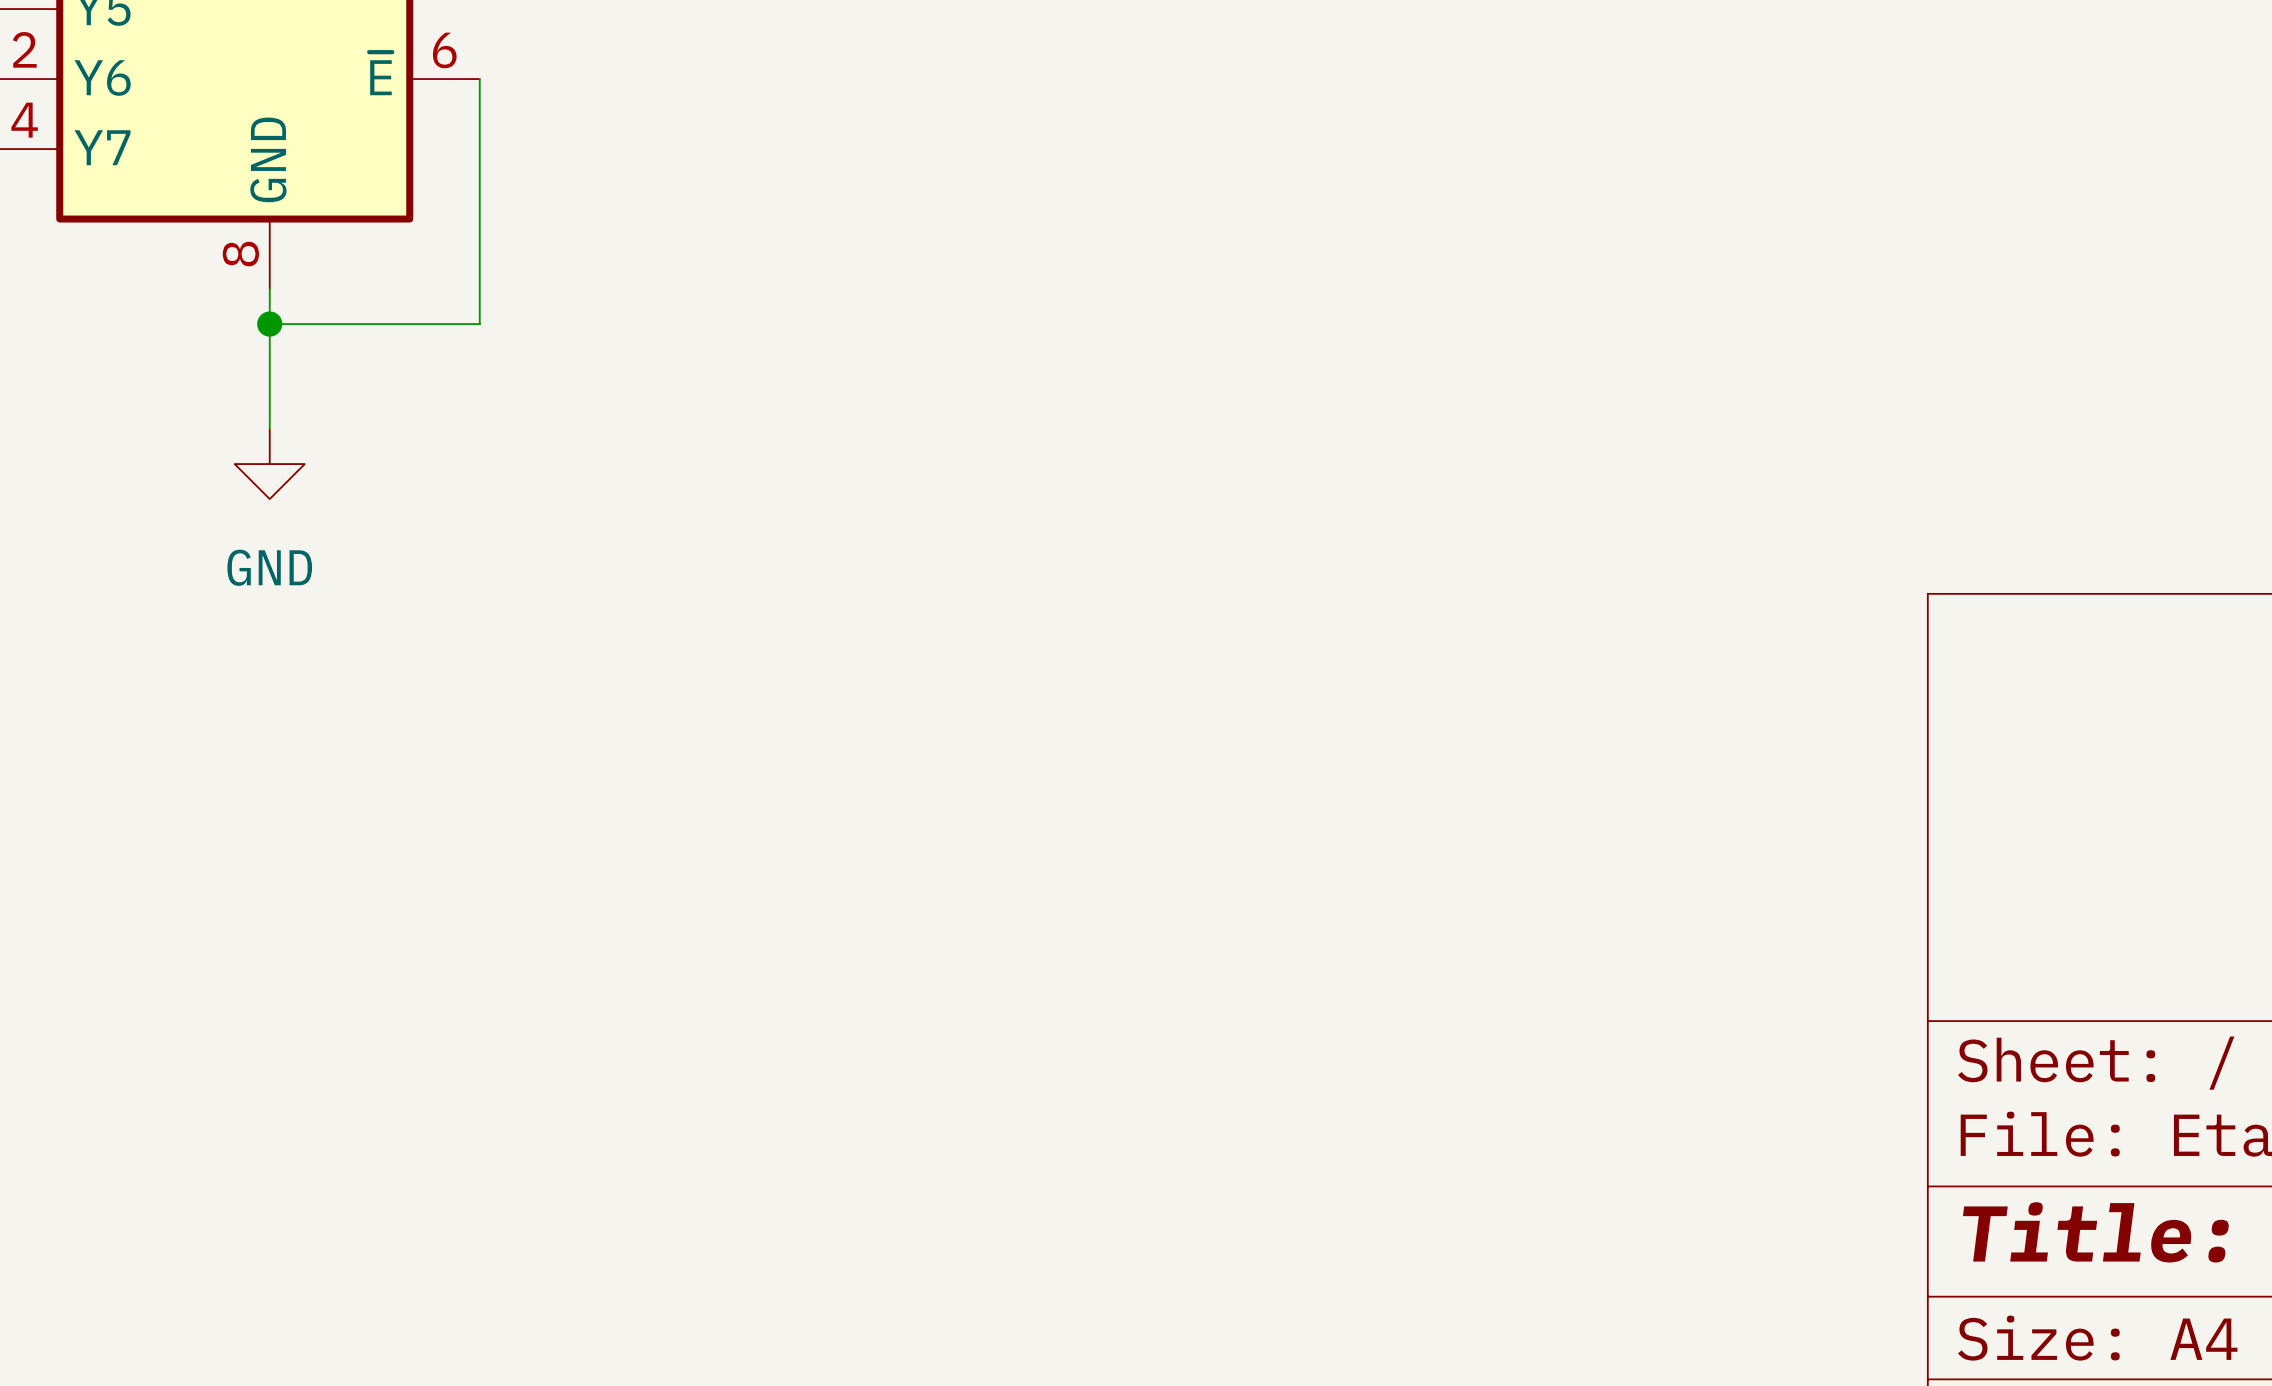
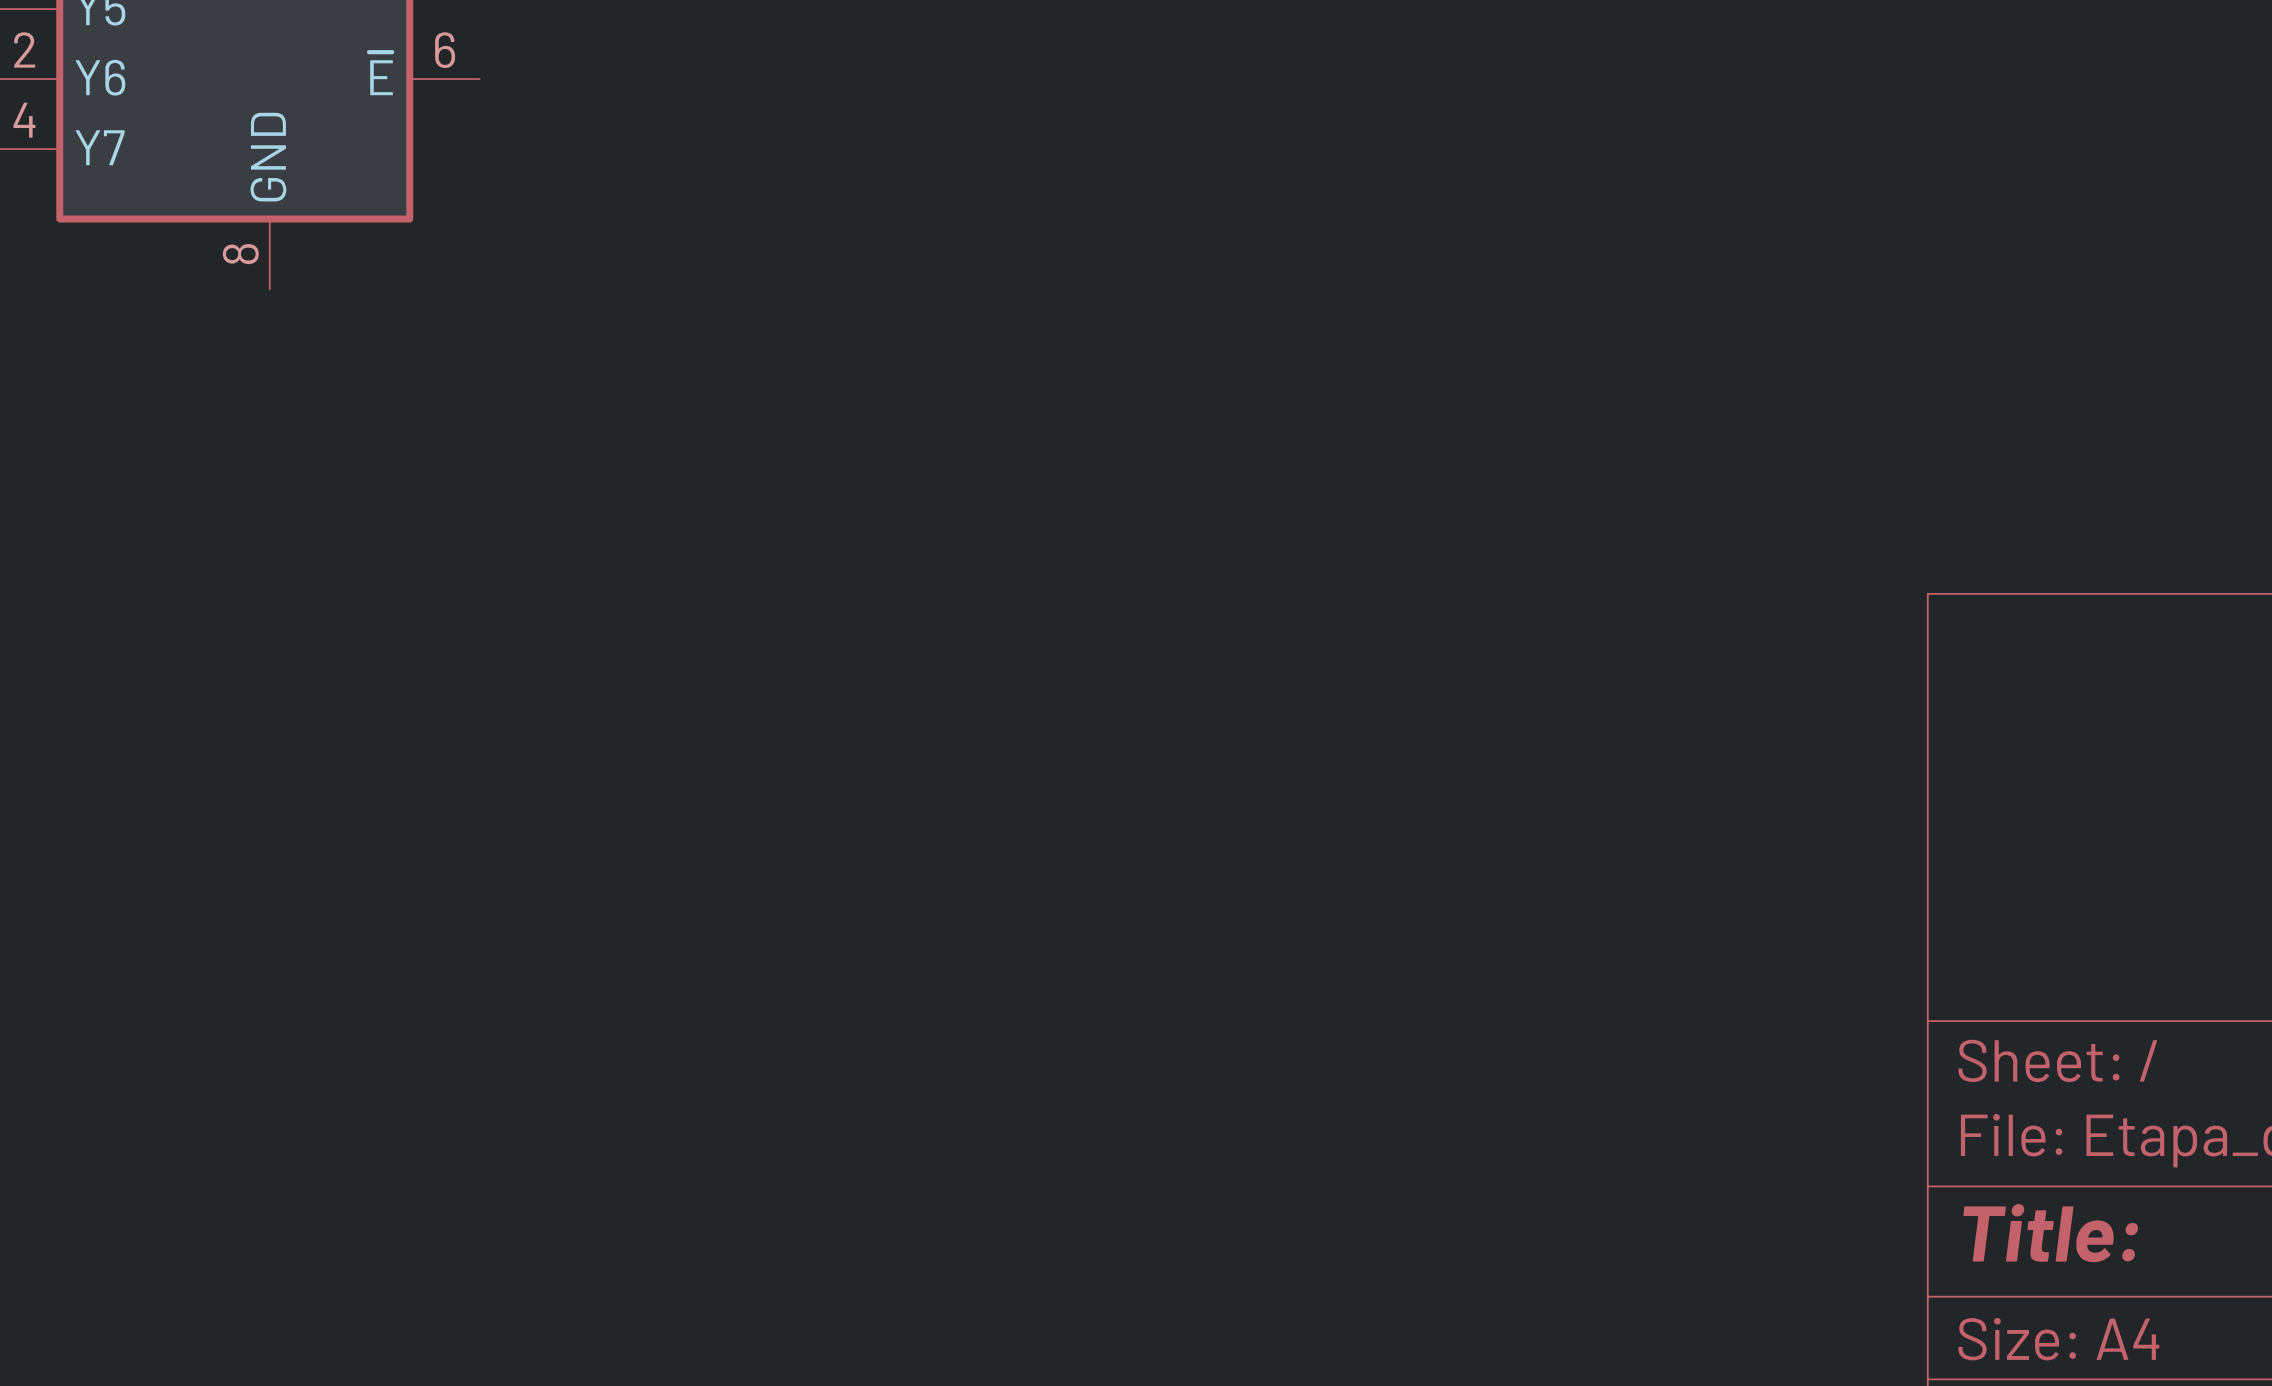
wire: (479, 79) (479, 324) (269, 324) -> none
wire: (269, 289) (269, 429) -> none
junction: (269, 324) -> none
power symbol: GND (269, 464) -> none

